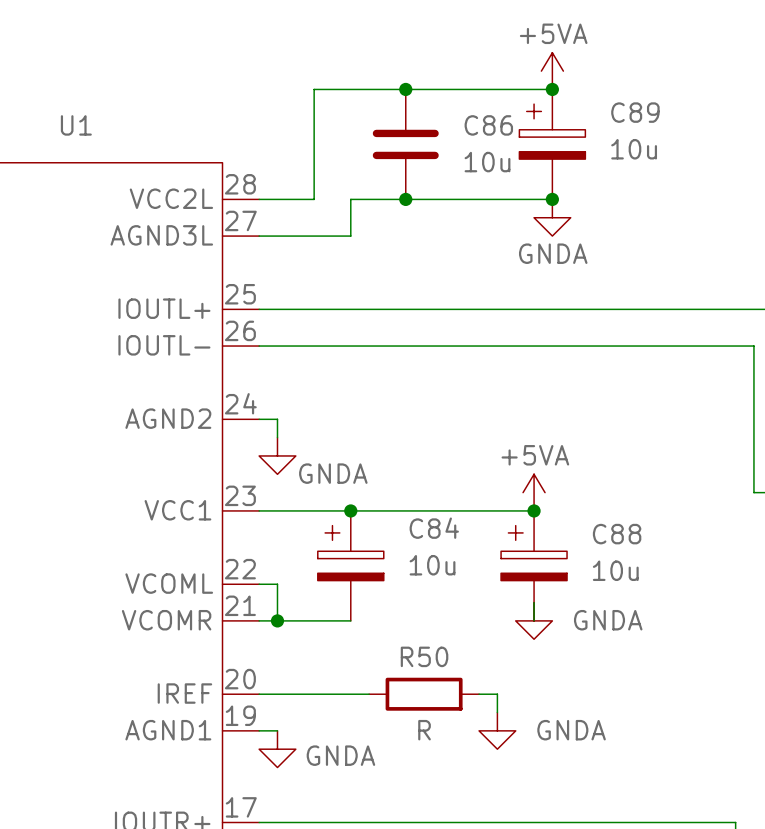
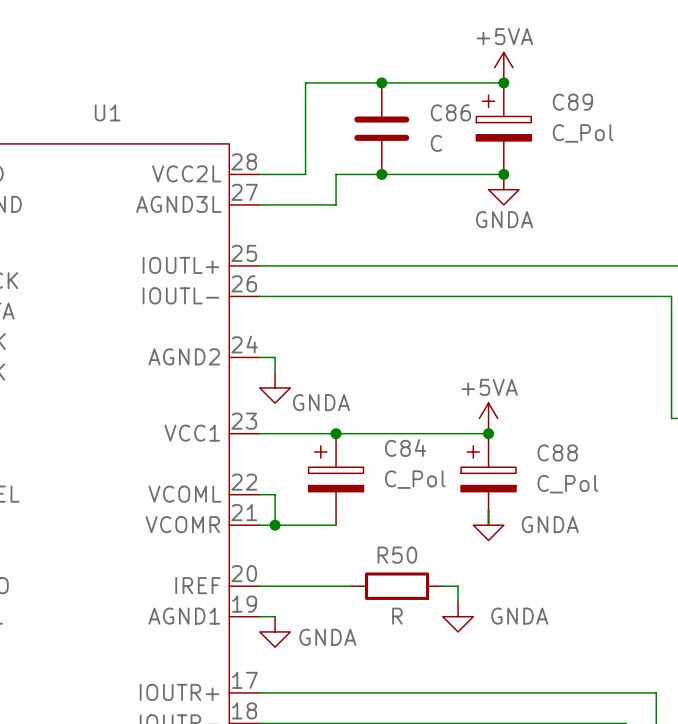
C89 value: 10u (634, 149) -> C_Pol (583, 133)
C86 value: 10u (487, 162) -> C (436, 143)
C84 value: 10u (432, 565) -> C_Pol (415, 479)
C88 value: 10u (615, 570) -> C_Pol (567, 484)

